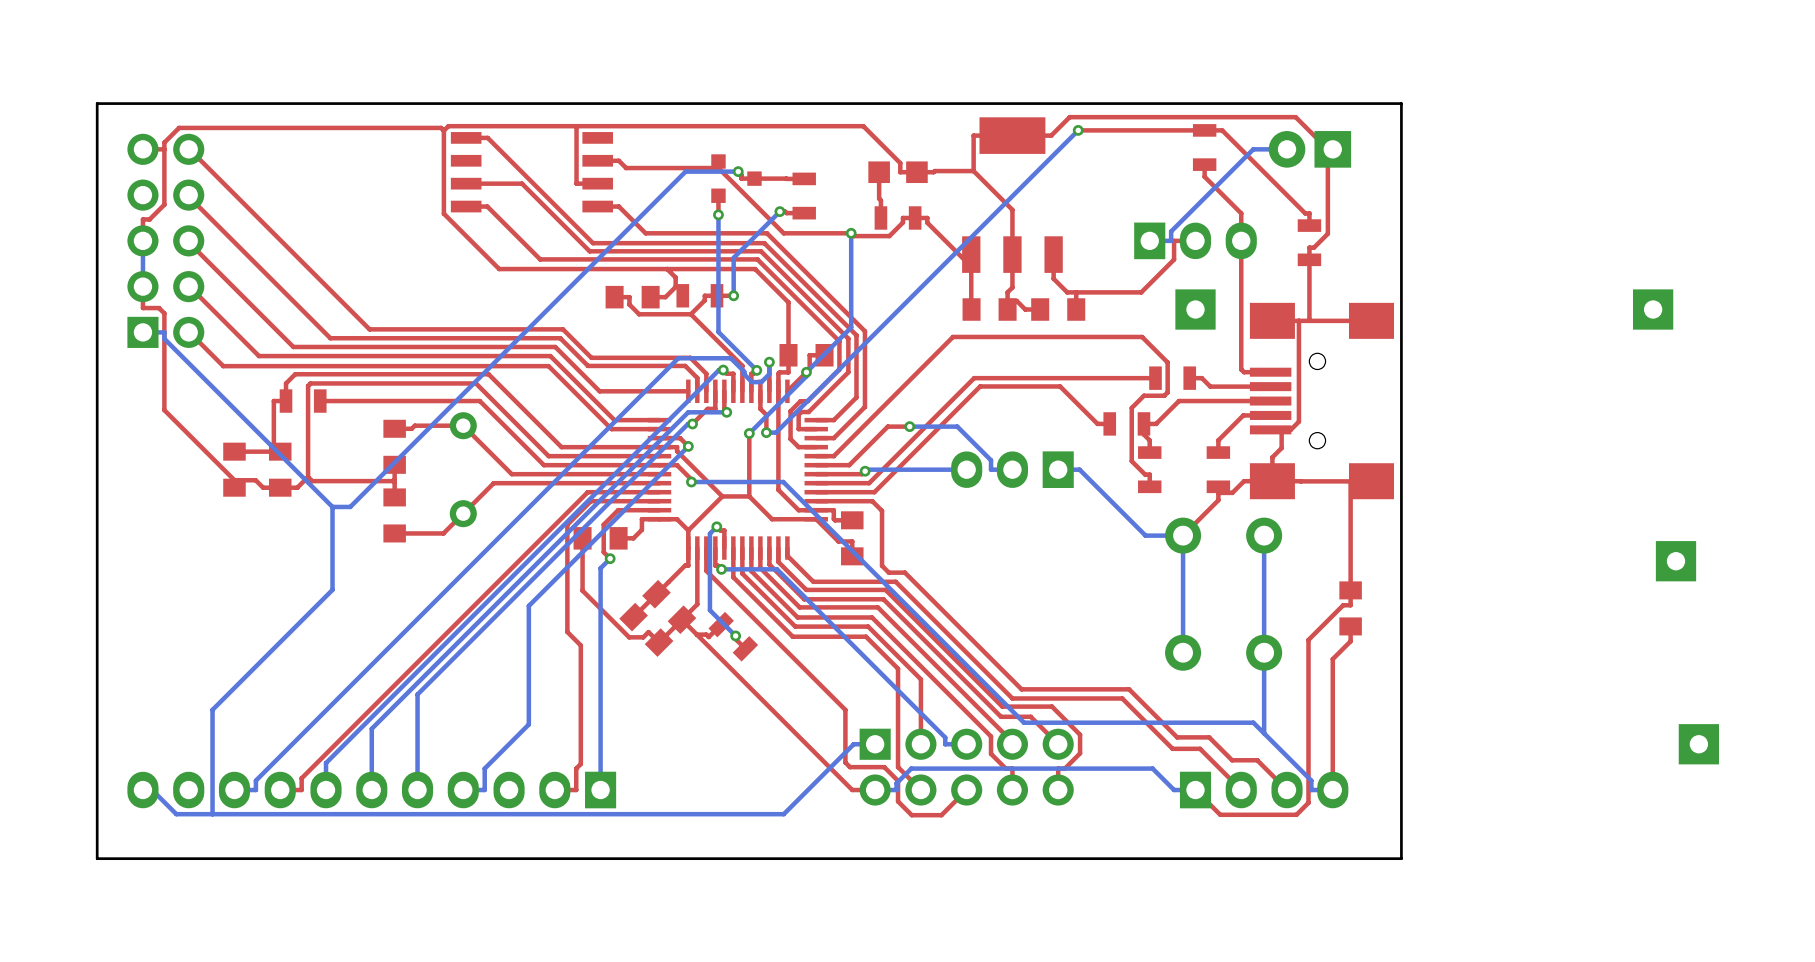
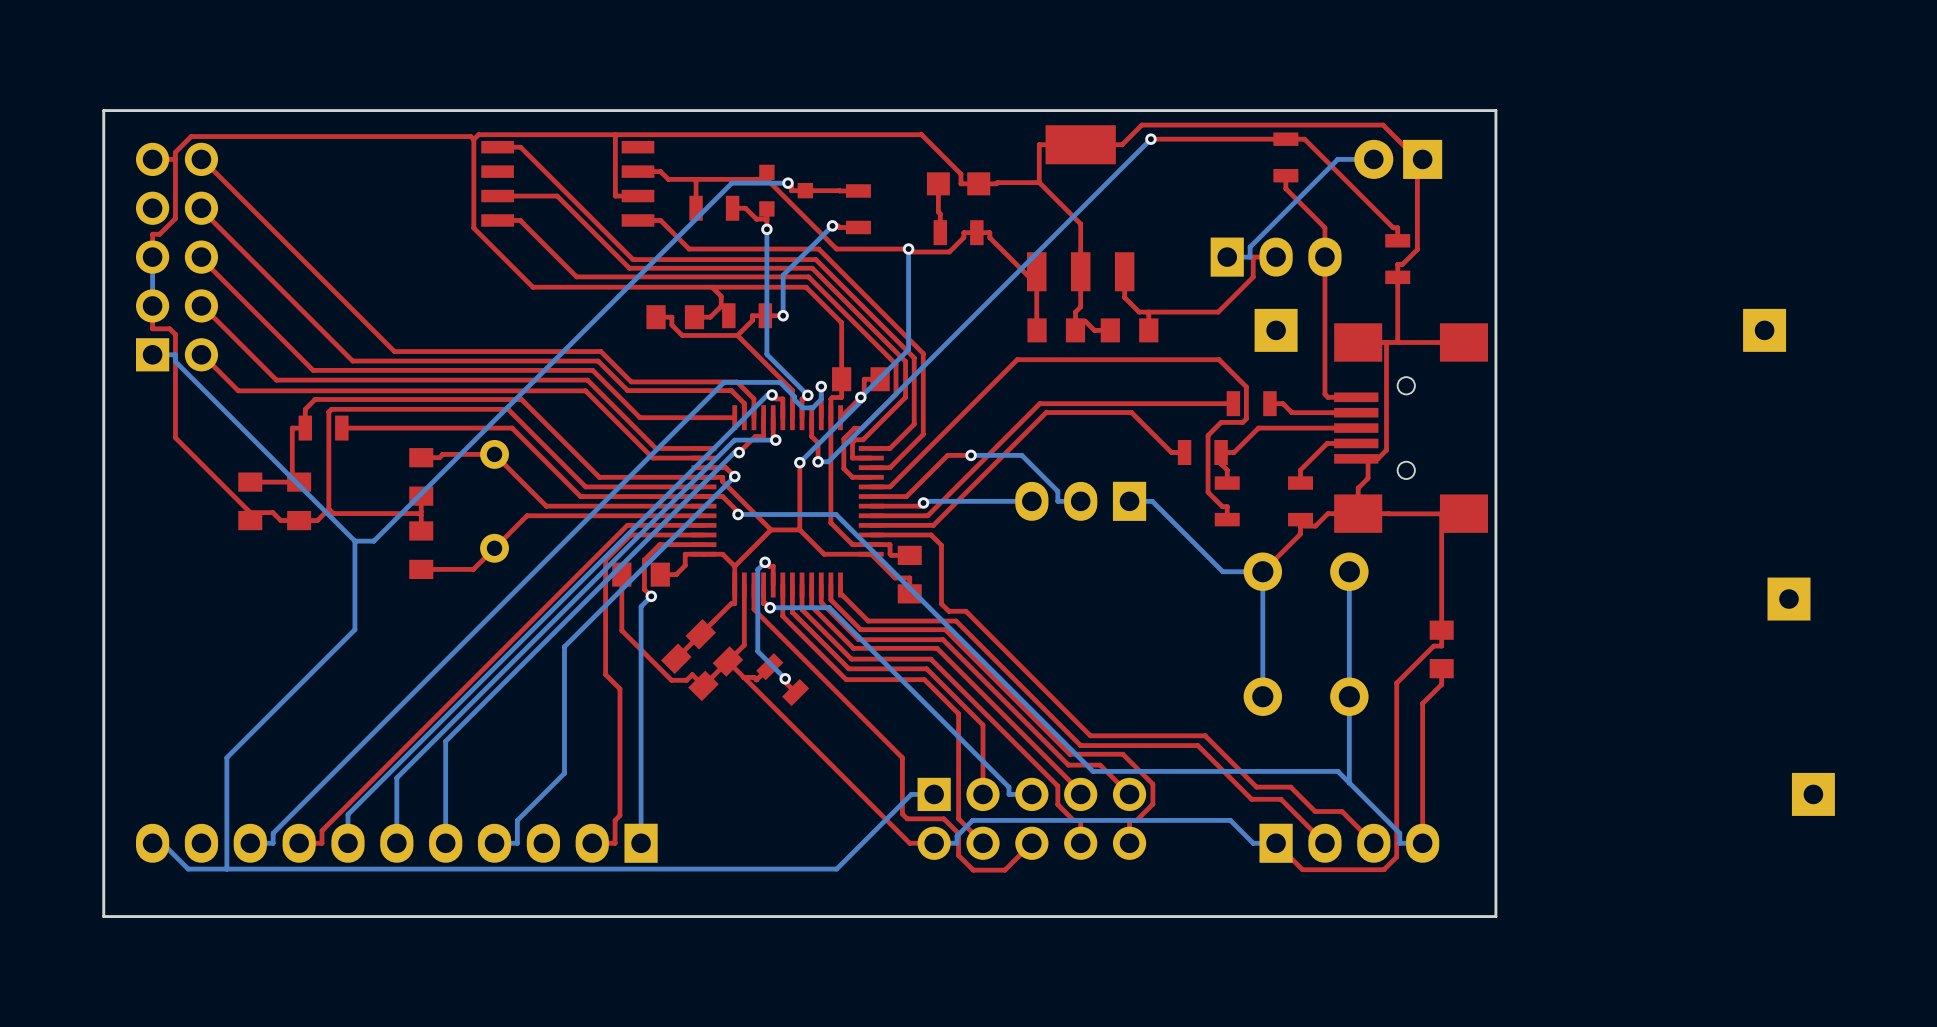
top track: none -> (696, 179) (696, 208)
part: none -> (714, 208)
top track: none -> (732, 208) (745, 208) (756, 219) (766, 219)

